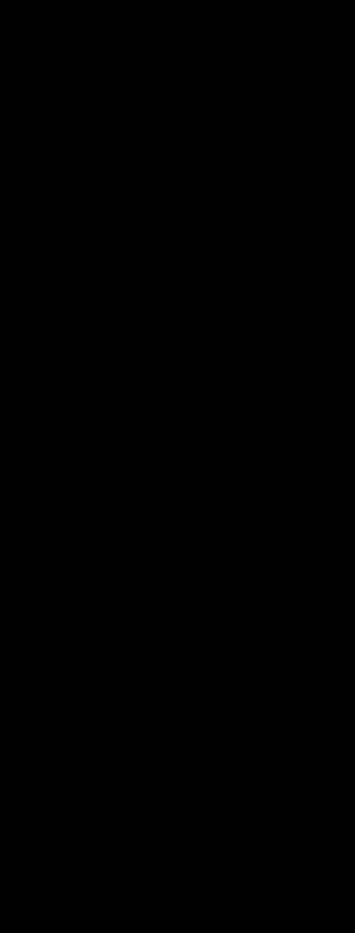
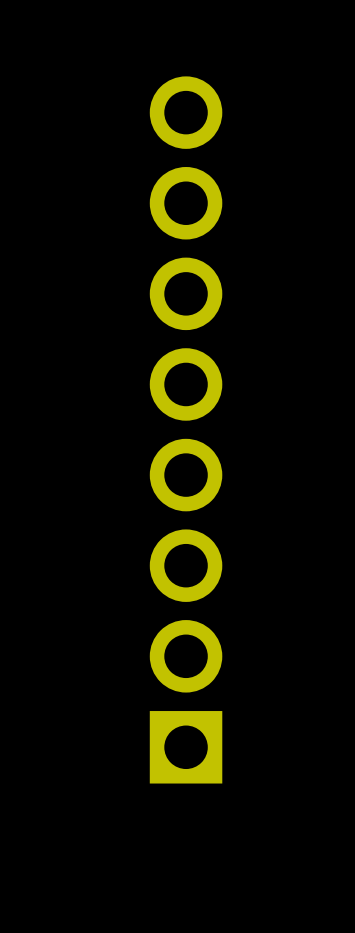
part: none -> (186, 429)

